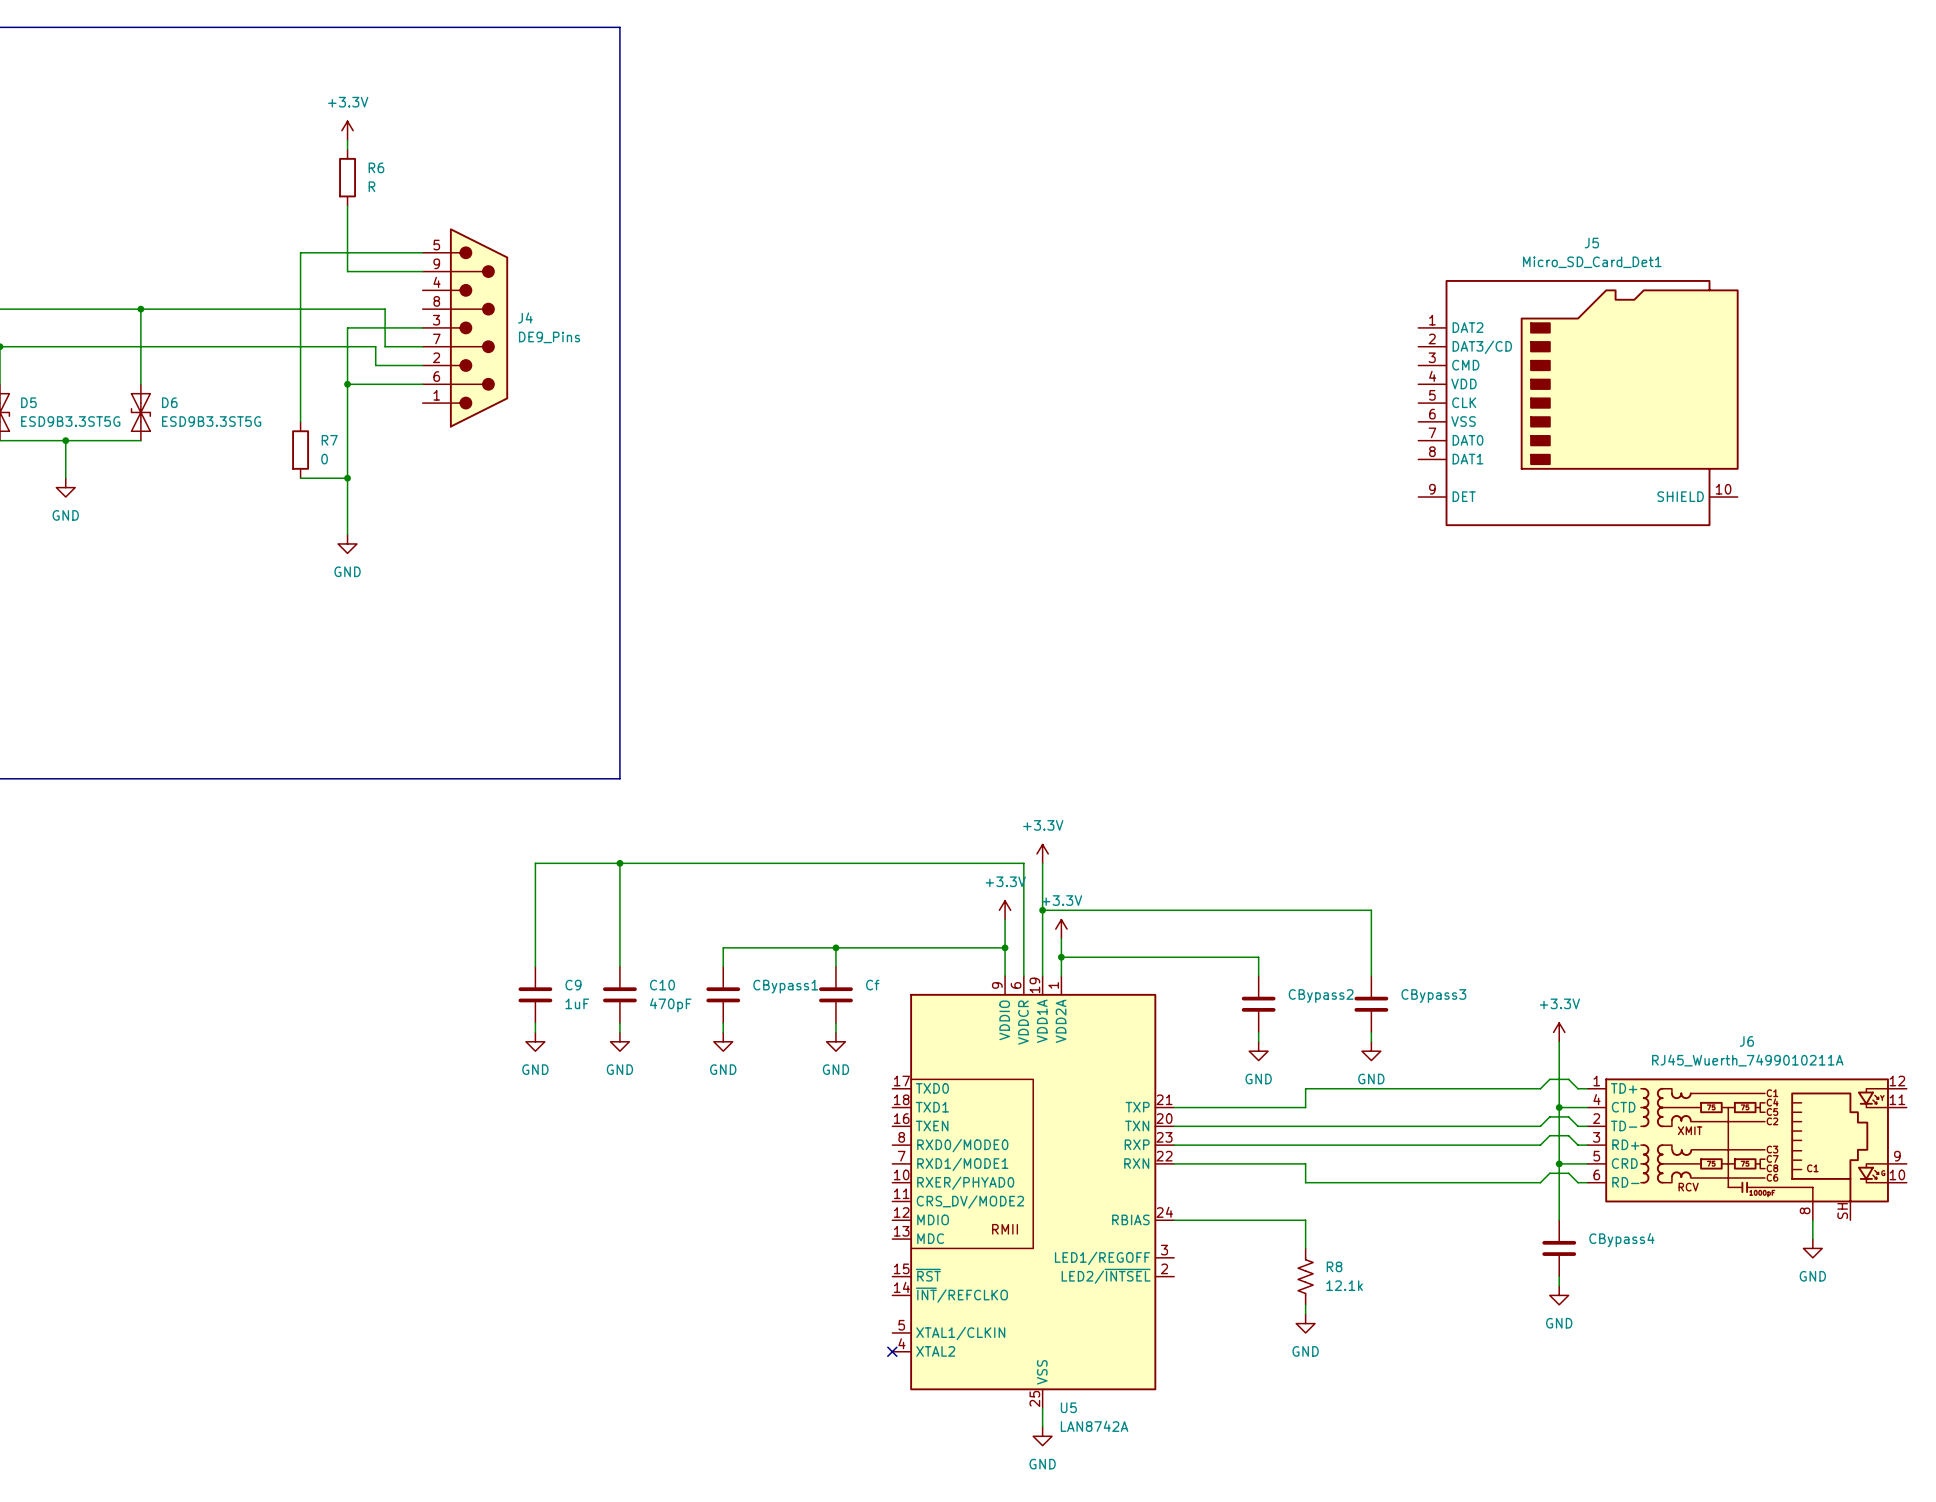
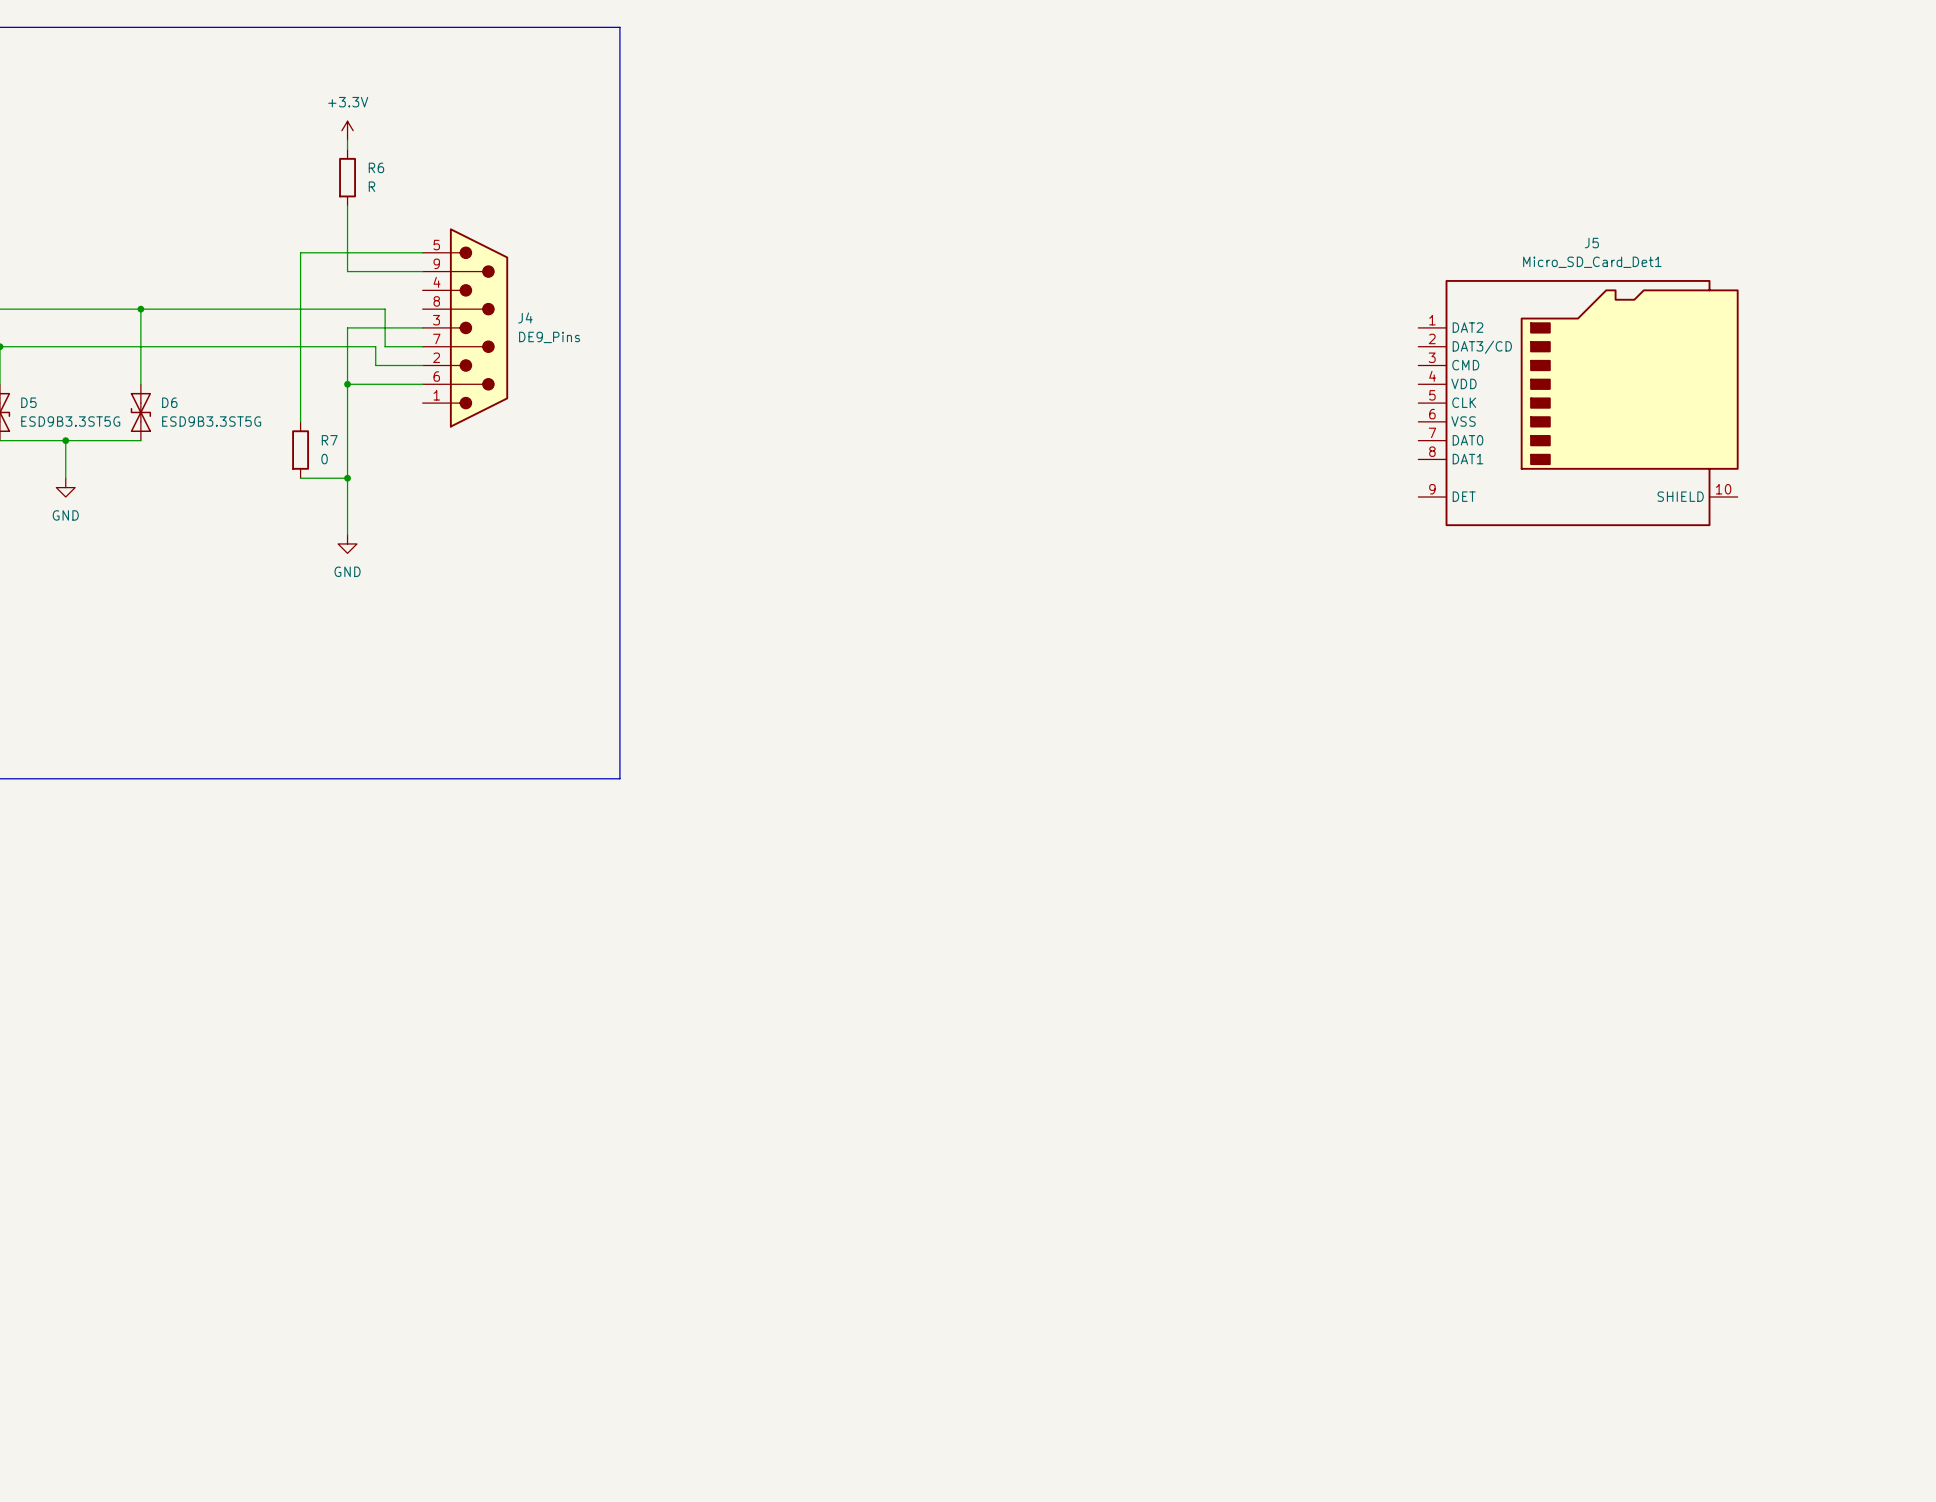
power symbol: +3.3V (1042, 853) -> none
wire: (619, 863) (619, 966) -> none
junction: (619, 863) -> none
wire: (1042, 863) (1042, 976) -> none
power symbol: +3.3V (1005, 910) -> none
wire: (1042, 910) (1371, 910) (1371, 976) -> none
junction: (1042, 910) -> none
wire: (1005, 919) (1005, 976) -> none
power symbol: +3.3V (1061, 929) -> none
wire: (1061, 938) (1061, 976) -> none
wire: (835, 947) (835, 966) -> none
junction: (835, 947) -> none
wire: (1005, 947) (723, 947) (723, 966) -> none
junction: (1005, 947) -> none
wire: (1061, 957) (1258, 957) (1258, 976) -> none
junction: (1061, 957) -> none
wire: (535, 966) (535, 863) (1023, 863) (1023, 976) -> none
C9: 1uF (535, 994) -> none
C10: 470pF (619, 994) -> none
CBypass1: (723, 994) -> none
Cf: (835, 994) -> none
CBypass2: (1258, 1004) -> none
CBypass3: (1371, 1004) -> none
wire: (535, 1023) (535, 1032) -> none
wire: (619, 1023) (619, 1032) -> none
wire: (723, 1023) (723, 1032) -> none
wire: (835, 1023) (835, 1032) -> none
wire: (1258, 1032) (1258, 1041) -> none
wire: (1371, 1032) (1371, 1041) -> none
power symbol: +3.3V (1559, 1032) -> none
power symbol: GND (535, 1041) -> none
power symbol: GND (619, 1041) -> none
power symbol: GND (723, 1041) -> none
power symbol: GND (835, 1041) -> none
wire: (1559, 1041) (1559, 1220) -> none
power symbol: GND (1258, 1051) -> none
power symbol: GND (1371, 1051) -> none
wire: (1587, 1088) (1578, 1088) (1568, 1079) (1549, 1079) (1540, 1088) (1305, 1088) (1305, 1107) (1174, 1107) -> none
wire: (1559, 1107) (1587, 1107) -> none
junction: (1559, 1107) -> none
wire: (1174, 1126) (1540, 1126) (1549, 1116) (1568, 1116) (1578, 1126) (1587, 1126) -> none
wire: (1174, 1145) (1540, 1145) (1549, 1135) (1568, 1135) (1578, 1145) (1587, 1145) -> none
J6: RJ45_Wuerth_7499010211A (1747, 1149) -> none
wire: (1174, 1163) (1305, 1163) (1305, 1182) (1540, 1182) (1549, 1173) (1568, 1173) (1578, 1182) (1587, 1182) -> none
wire: (1559, 1163) (1587, 1163) -> none
junction: (1559, 1163) -> none
U5: LAN8742A (1033, 1192) -> none
wire: (1174, 1220) (1305, 1220) (1305, 1248) -> none
wire: (1812, 1220) (1812, 1239) -> none
CBypass4: (1559, 1248) -> none
power symbol: GND (1812, 1248) -> none
R8: 12.1k (1305, 1276) -> none
wire: (1559, 1276) (1559, 1286) -> none
power symbol: GND (1559, 1295) -> none
wire: (1305, 1304) (1305, 1314) -> none
power symbol: GND (1305, 1323) -> none
no-connect mark: (892, 1351) -> none
wire: (1042, 1408) (1042, 1426) -> none
power symbol: GND (1042, 1436) -> none

